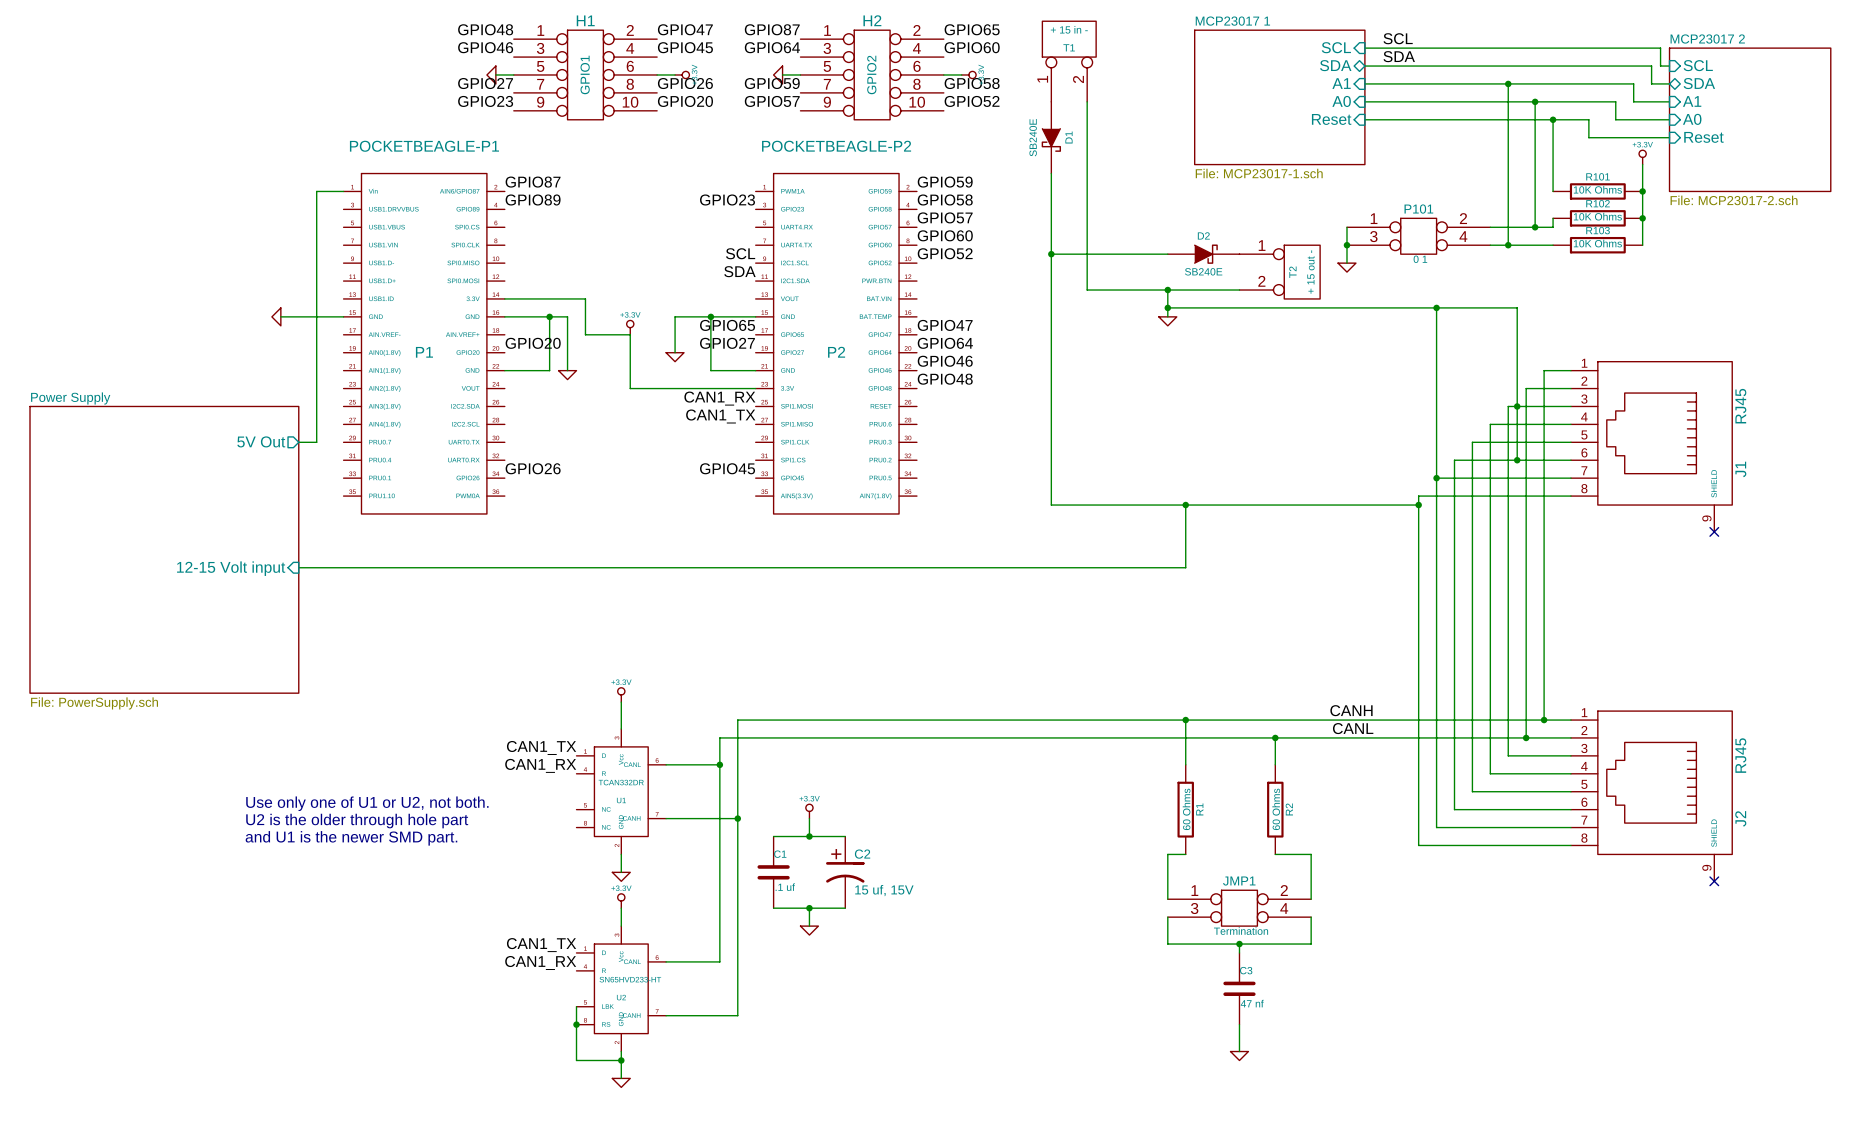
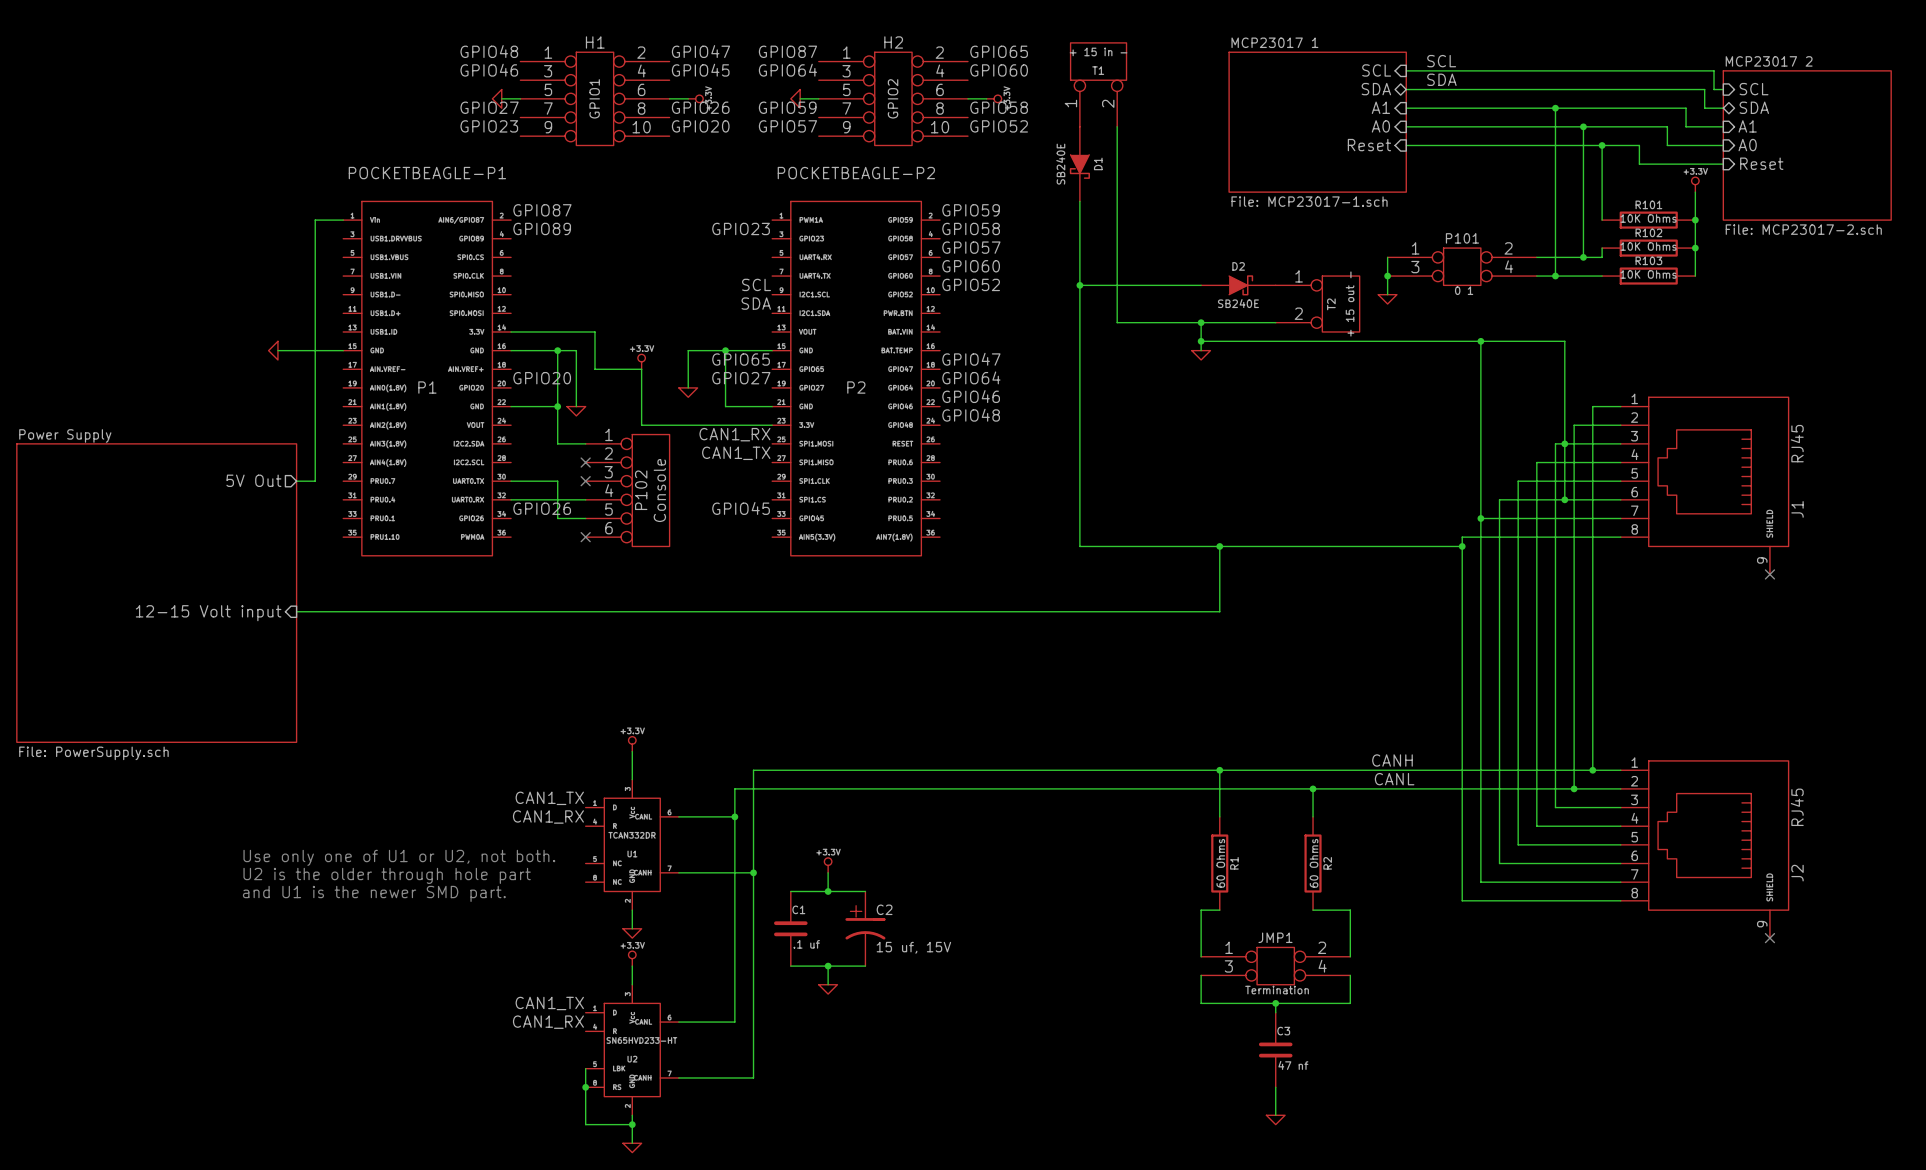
wire: none -> (557, 406) (557, 443) (585, 443)
junction: none -> (557, 406)
no-connect mark: none -> (585, 462)
wire: none -> (511, 481) (557, 481) (557, 518) (585, 518)
no-connect mark: none -> (585, 481)
P102: none -> Console (627, 490)
wire: none -> (511, 499) (585, 499)
no-connect mark: none -> (585, 537)

